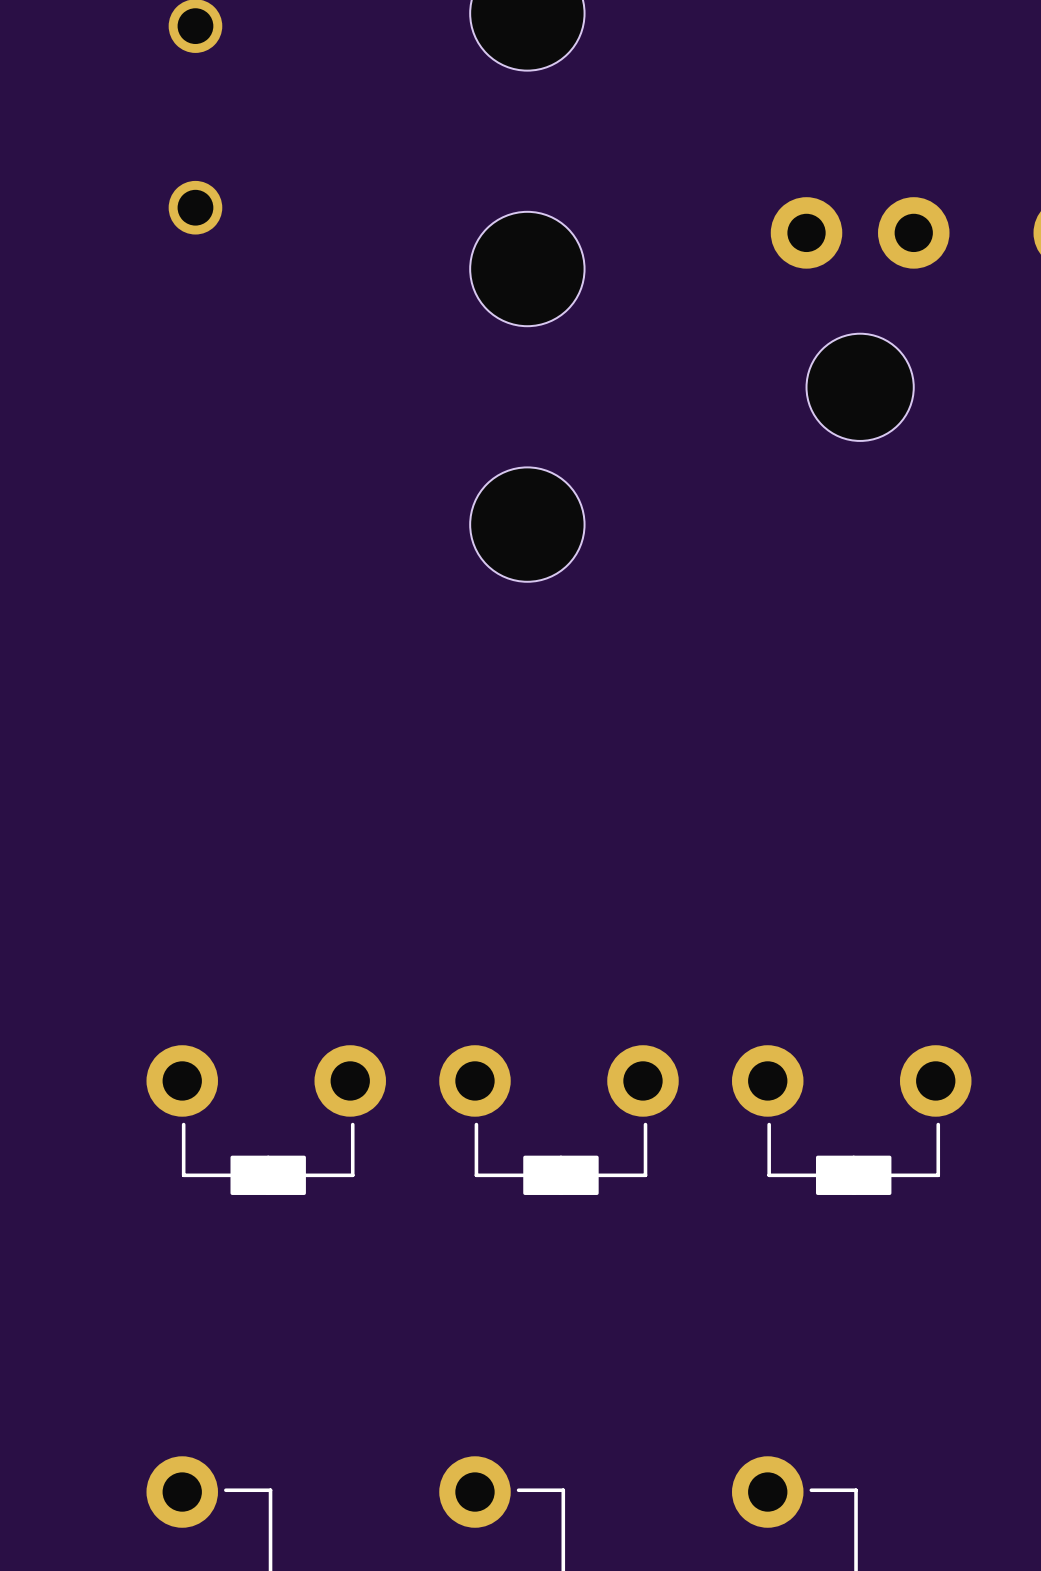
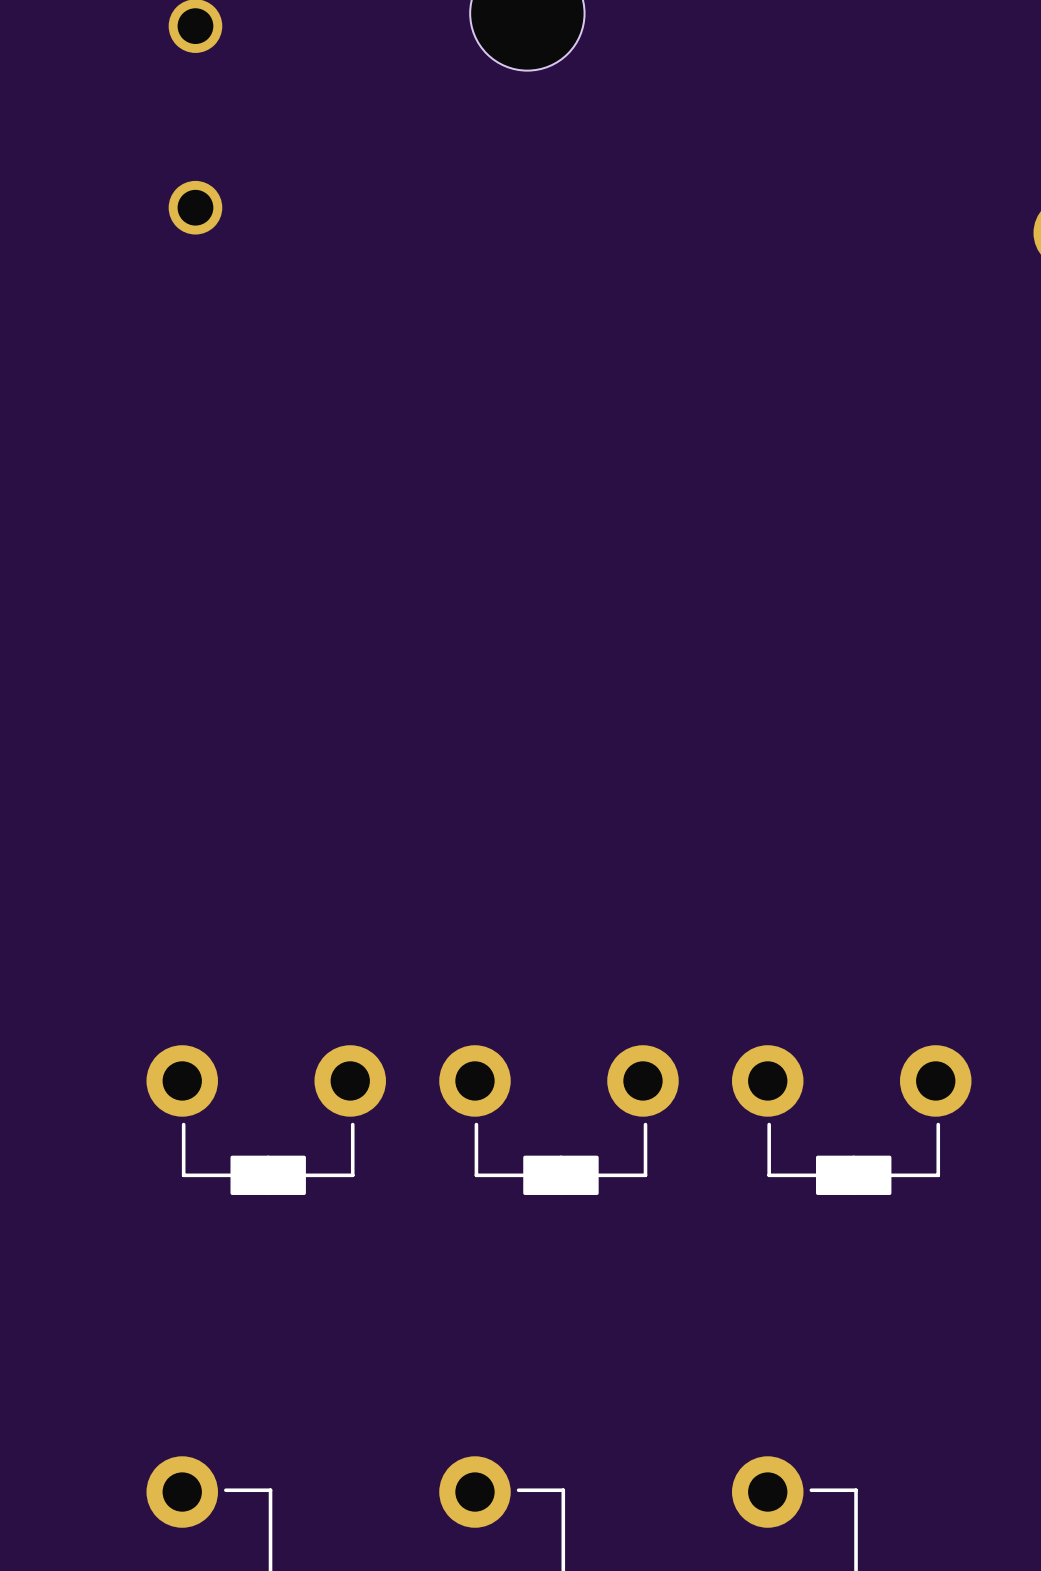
part: (527, 269) -> none
part: (860, 319) -> none
part: (527, 524) -> none

